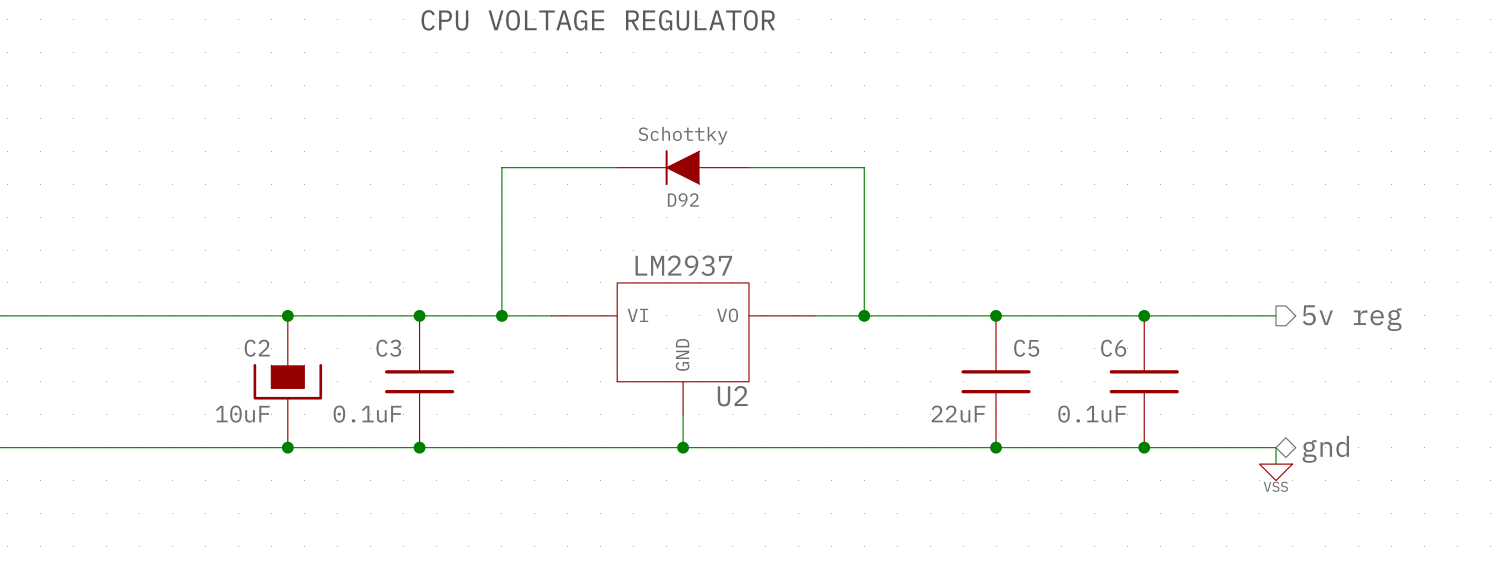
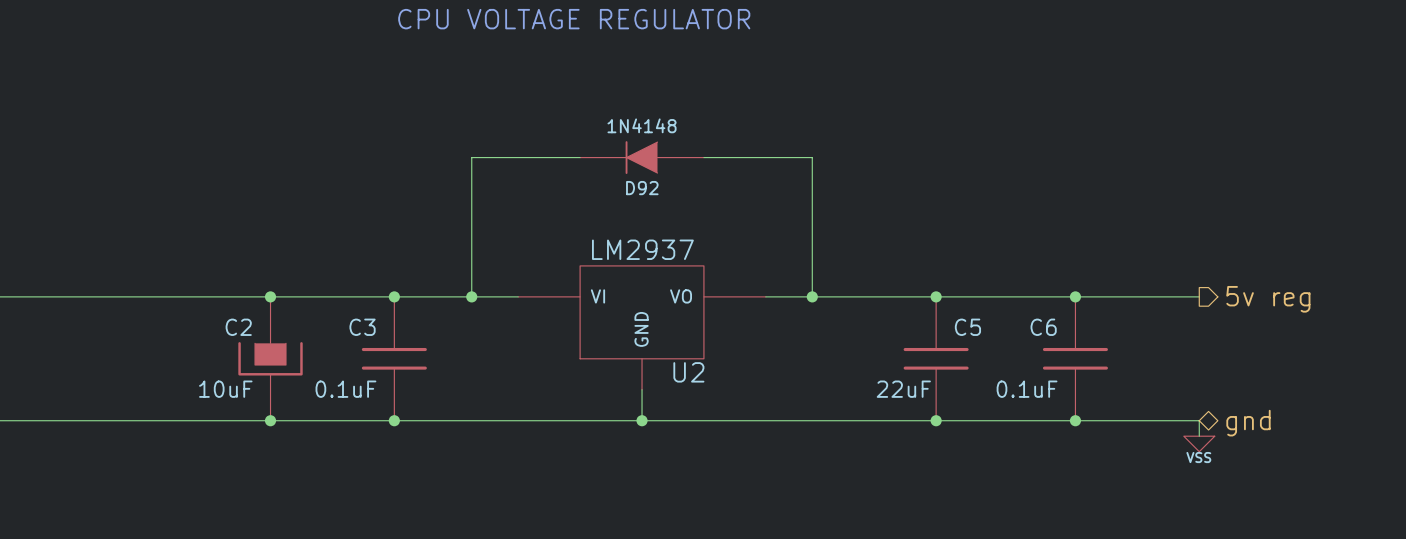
D92 value: Schottky (683, 135) -> 1N4148 (642, 125)

